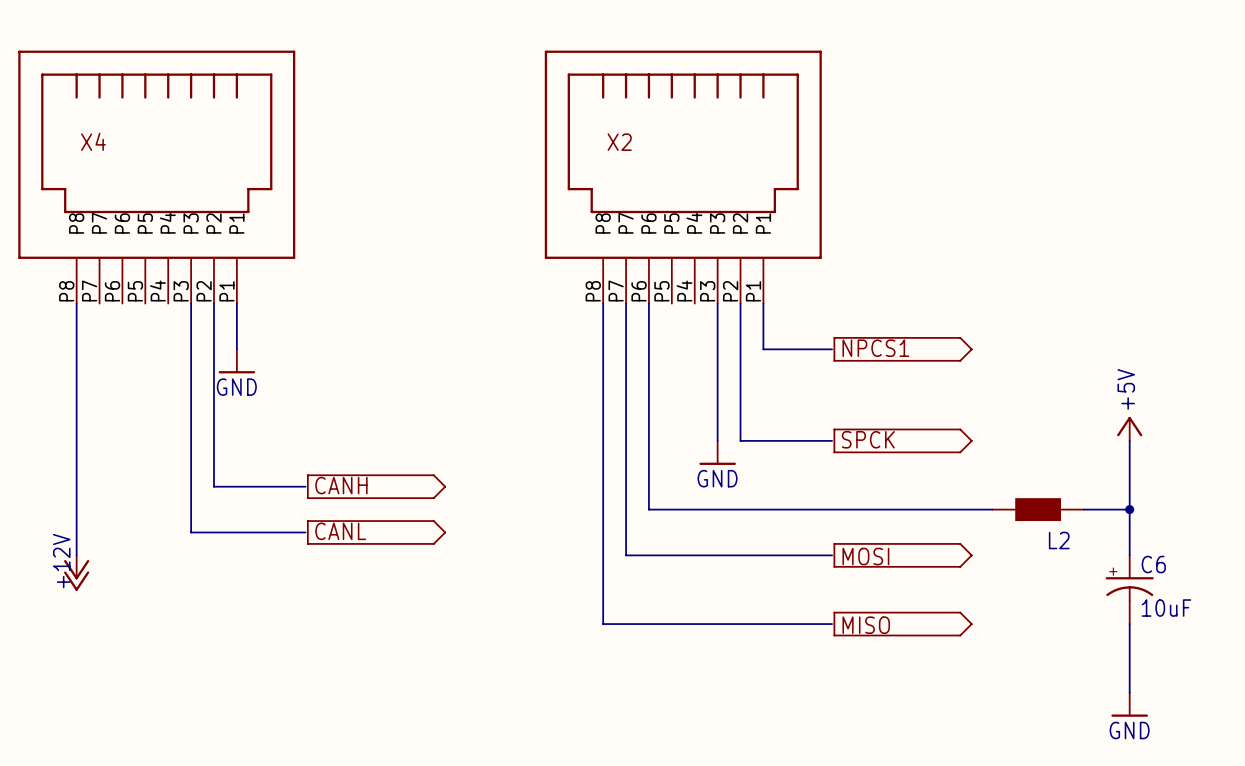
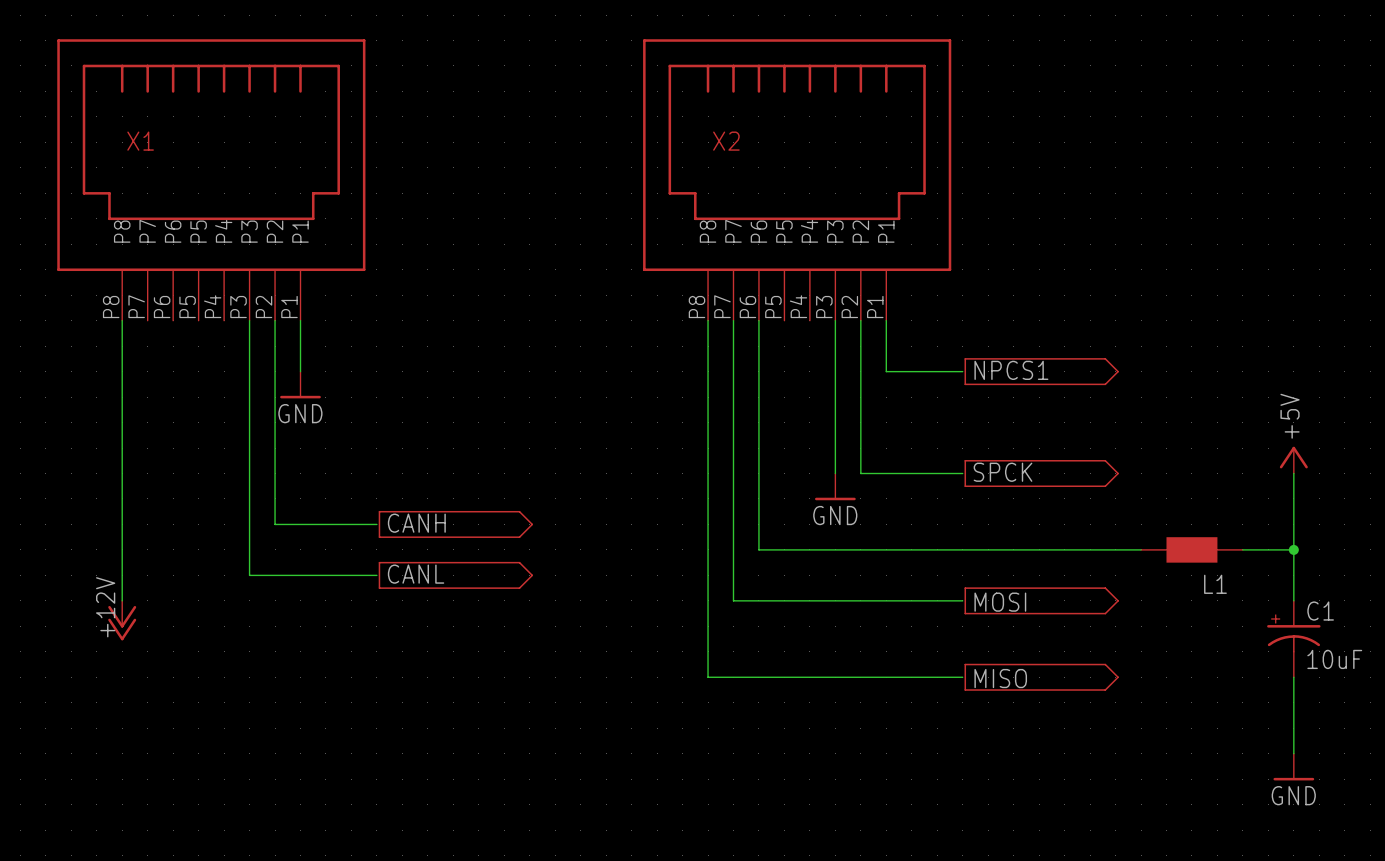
X4 name: X4 (93, 141) -> X1 (140, 141)
L2 name: L2 (1059, 540) -> L1 (1215, 584)
C6 name: C6 (1153, 564) -> C1 (1320, 611)

